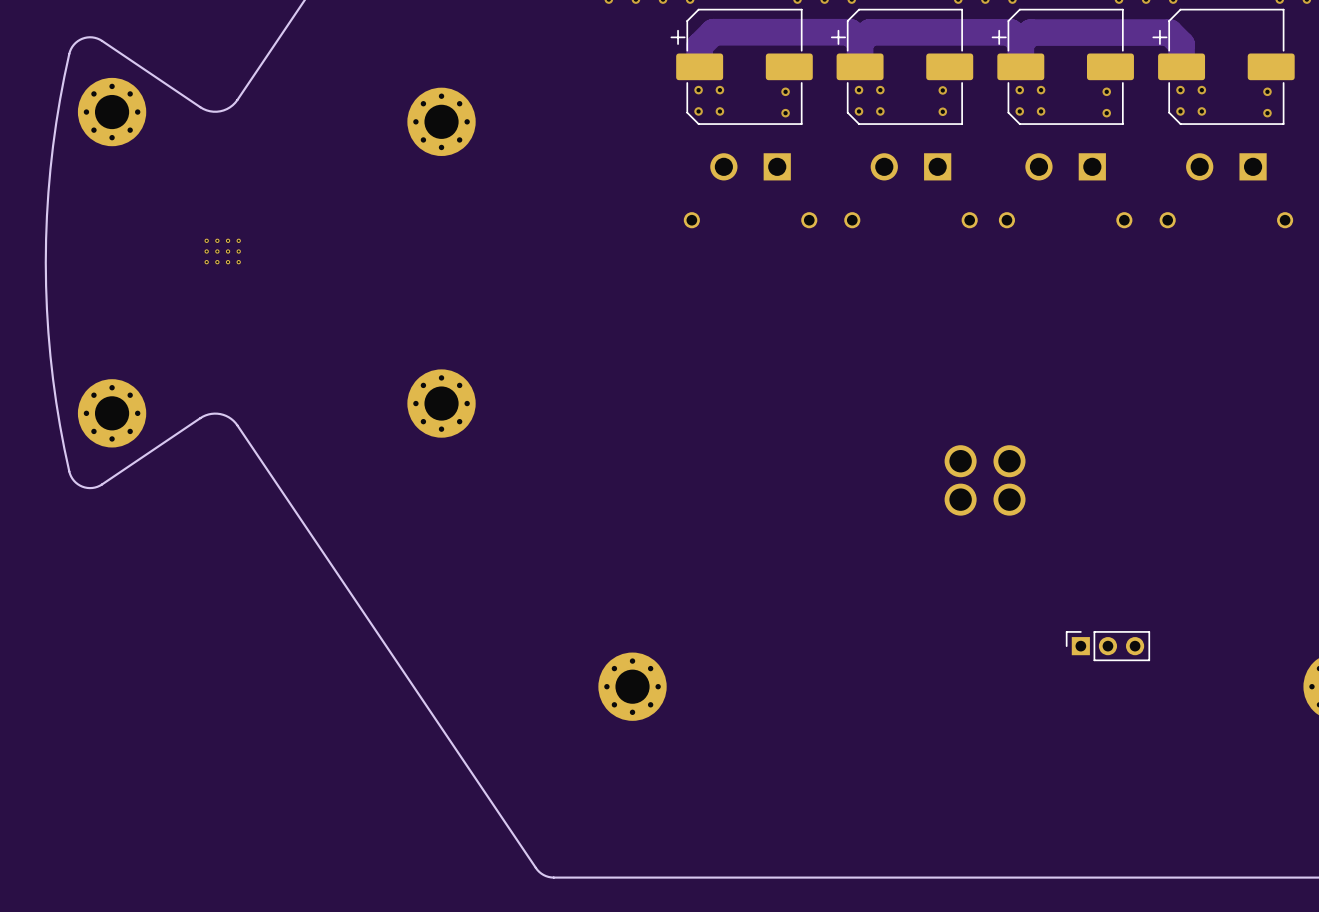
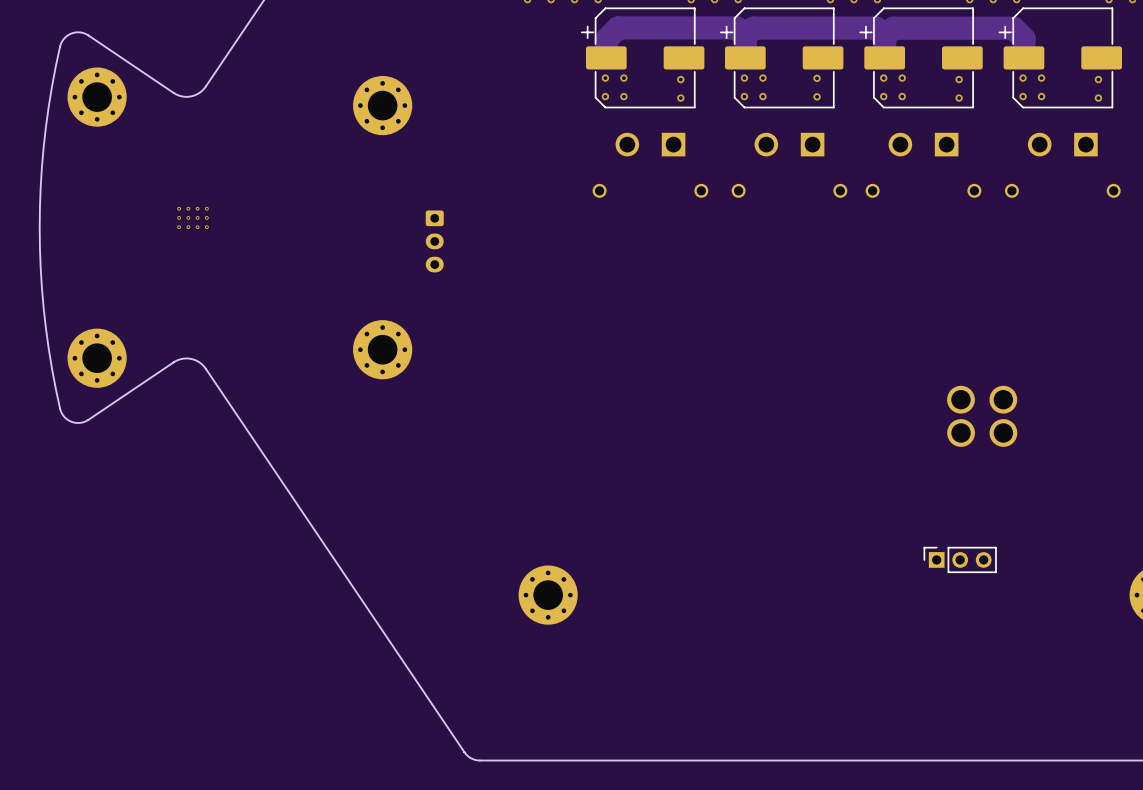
part: none -> (434, 241)
part: (985, 461) -> none
part: none -> (982, 399)
part: (985, 499) -> none
part: none -> (982, 432)

